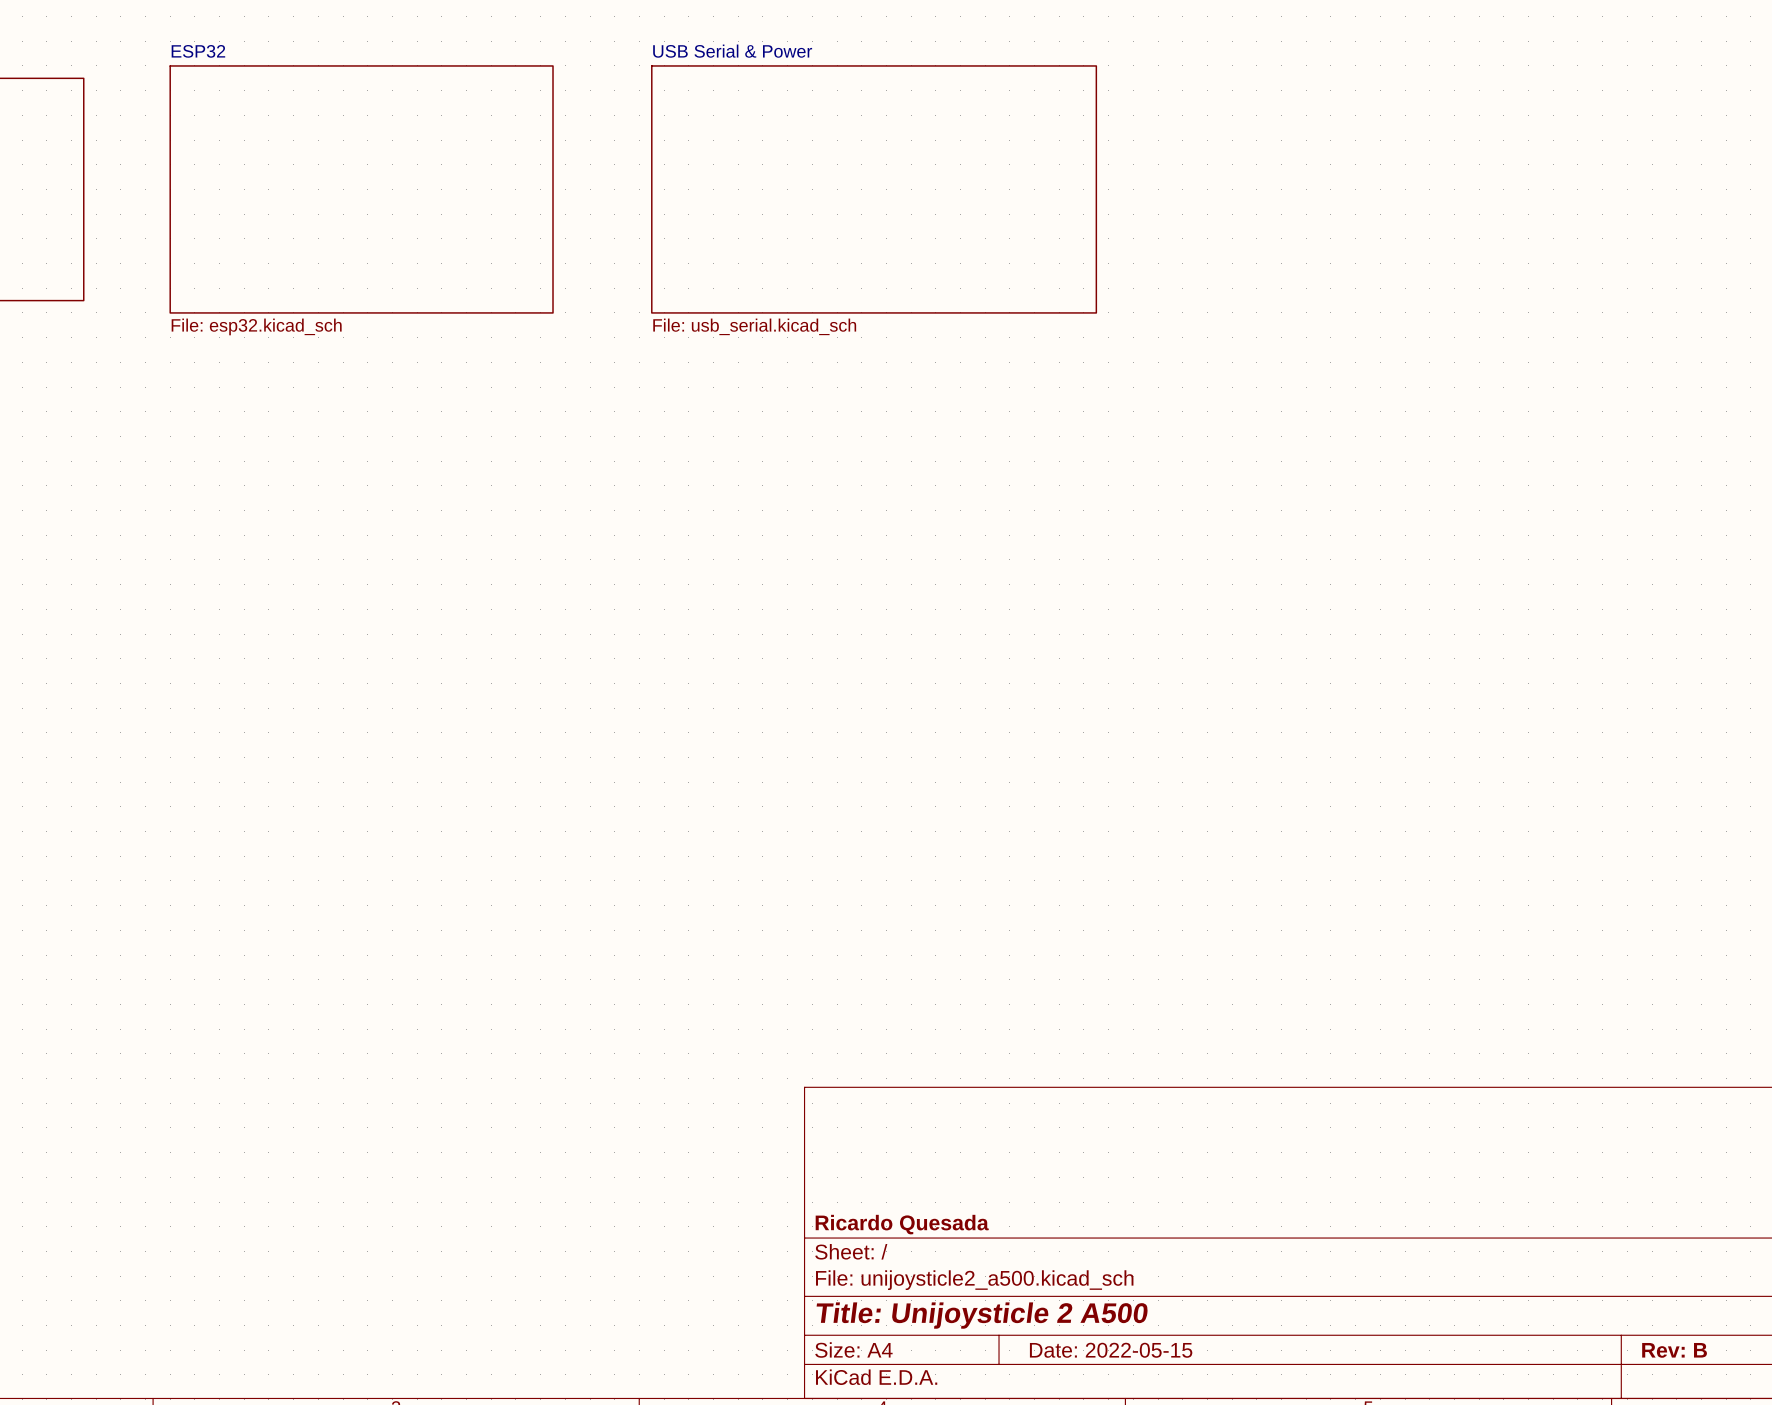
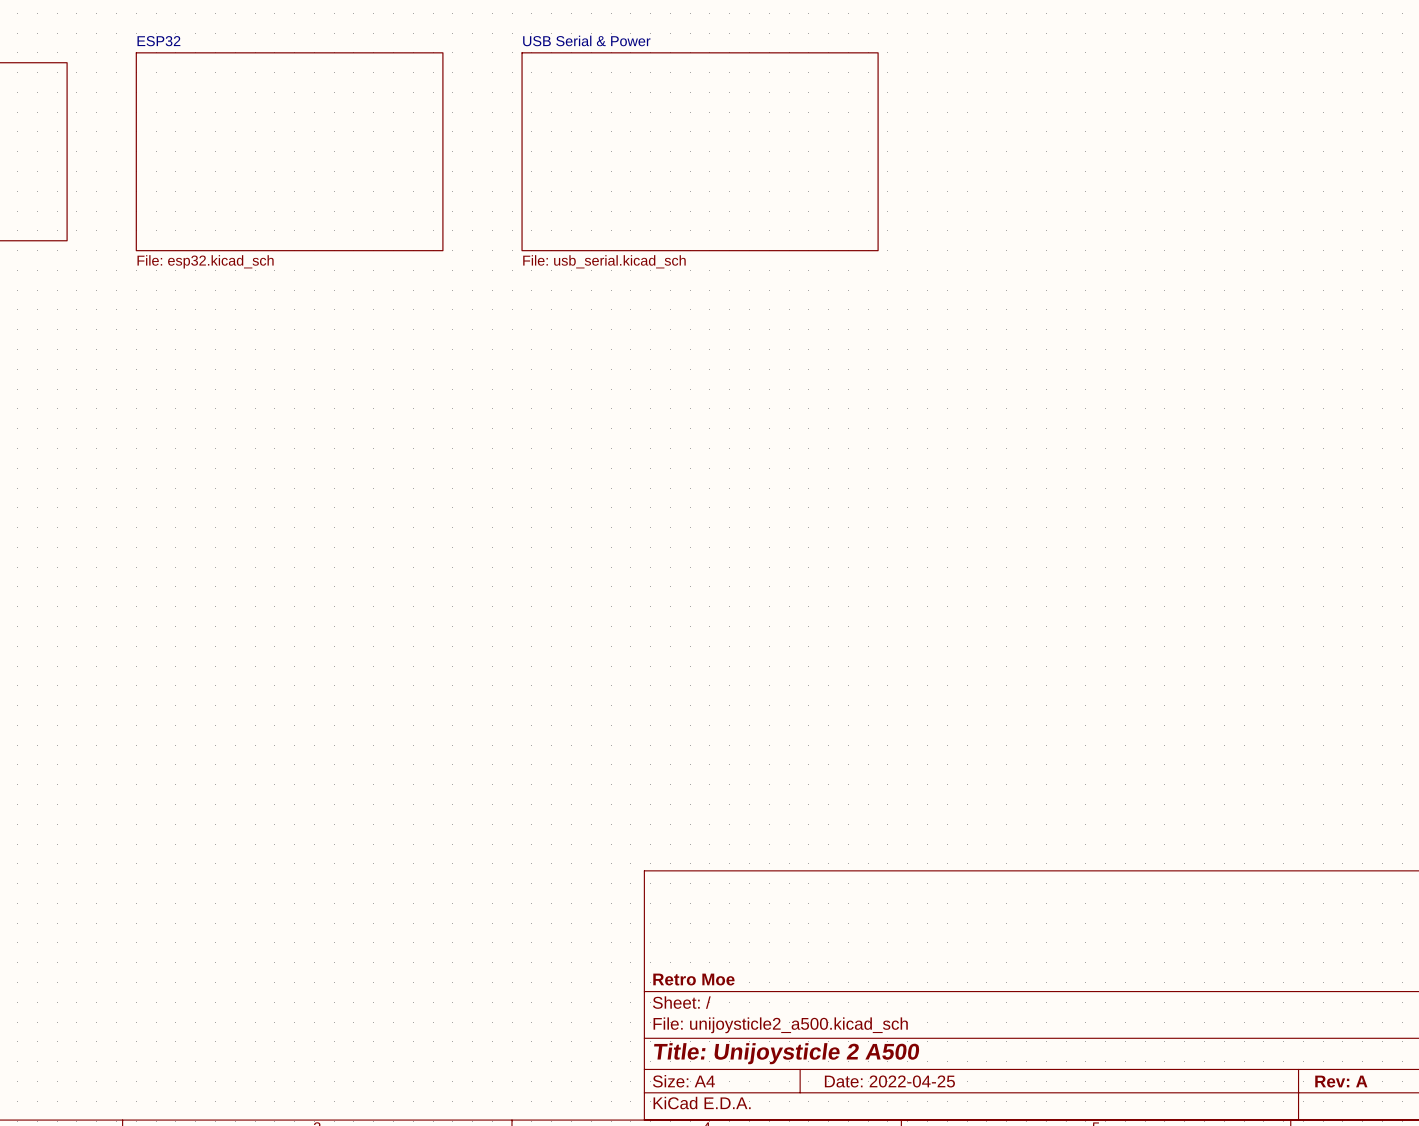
title block: Ricardo Quesada (902, 1224) -> Retro Moe (693, 979)
title block: Date: 2022-05-15 (1111, 1350) -> Date: 2022-04-25 (889, 1081)
title block: Rev: B (1674, 1350) -> Rev: A (1341, 1081)

